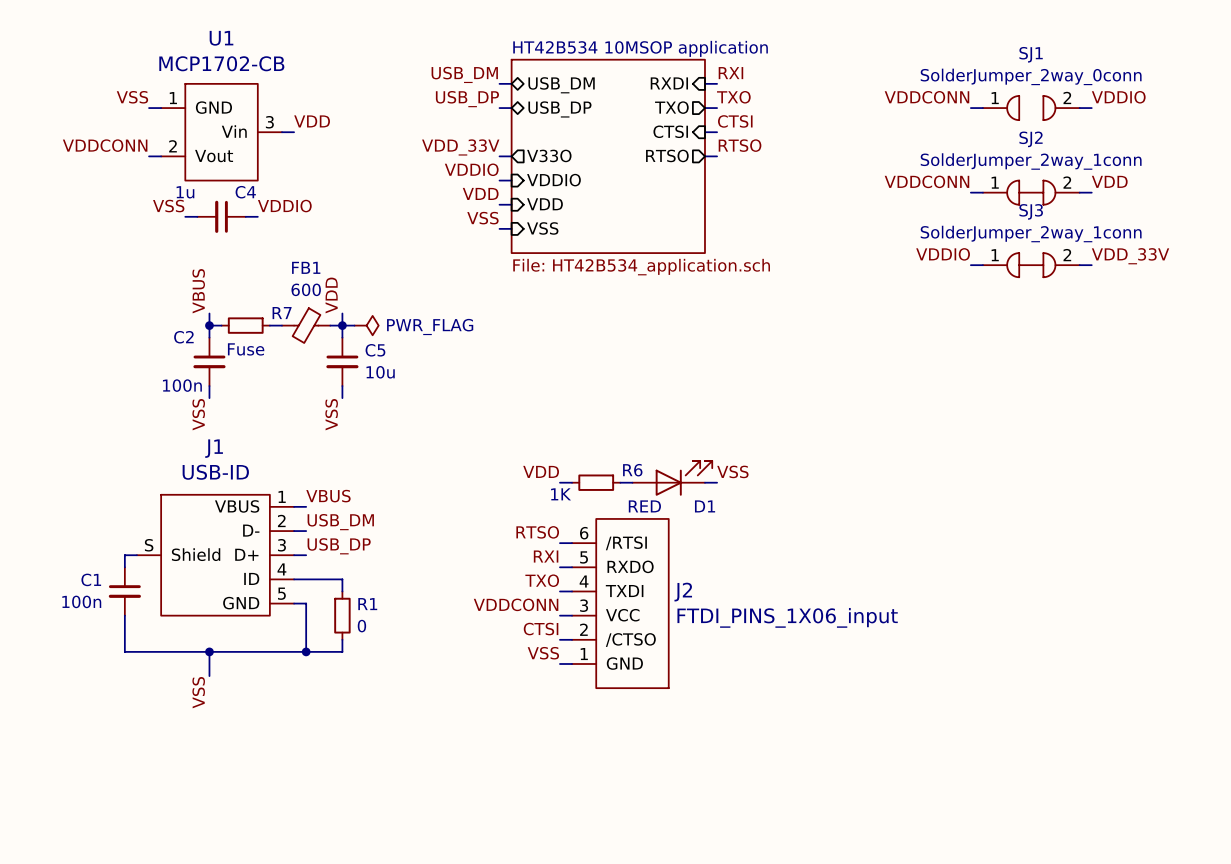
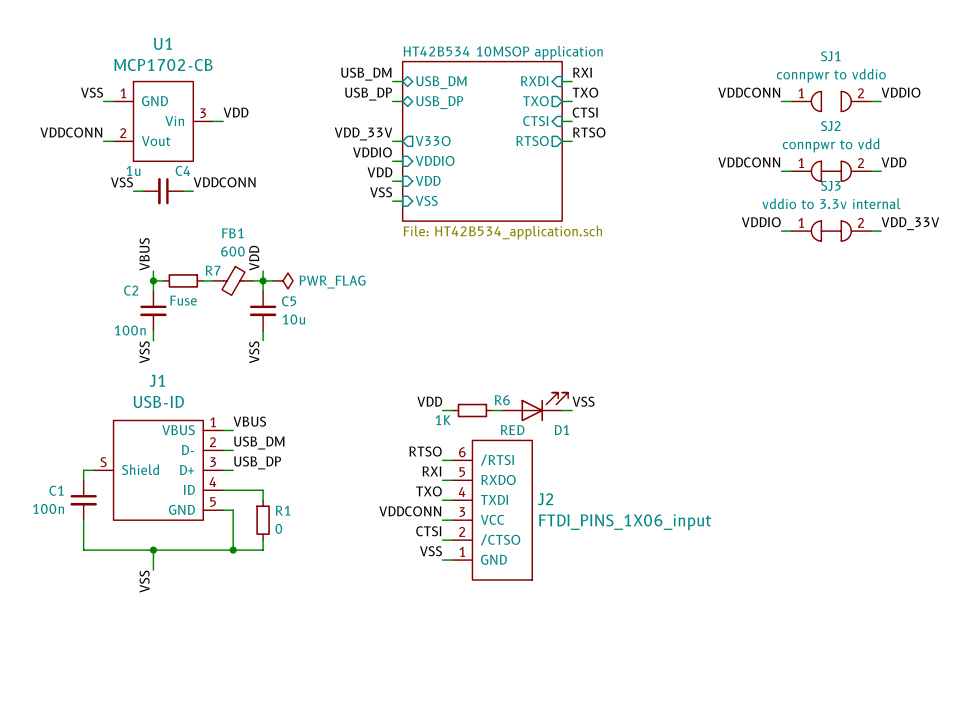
SJ1 value: SolderJumper_2way_0conn (1031, 76) -> connpwr to vddio (831, 75)
SJ2 value: SolderJumper_2way_1conn (1031, 161) -> connpwr to vdd (831, 145)
label: VDDIO (284, 206) -> VDDCONN (224, 182)
SJ3 value: SolderJumper_2way_1conn (1031, 234) -> vddio to 3.3v internal (831, 203)

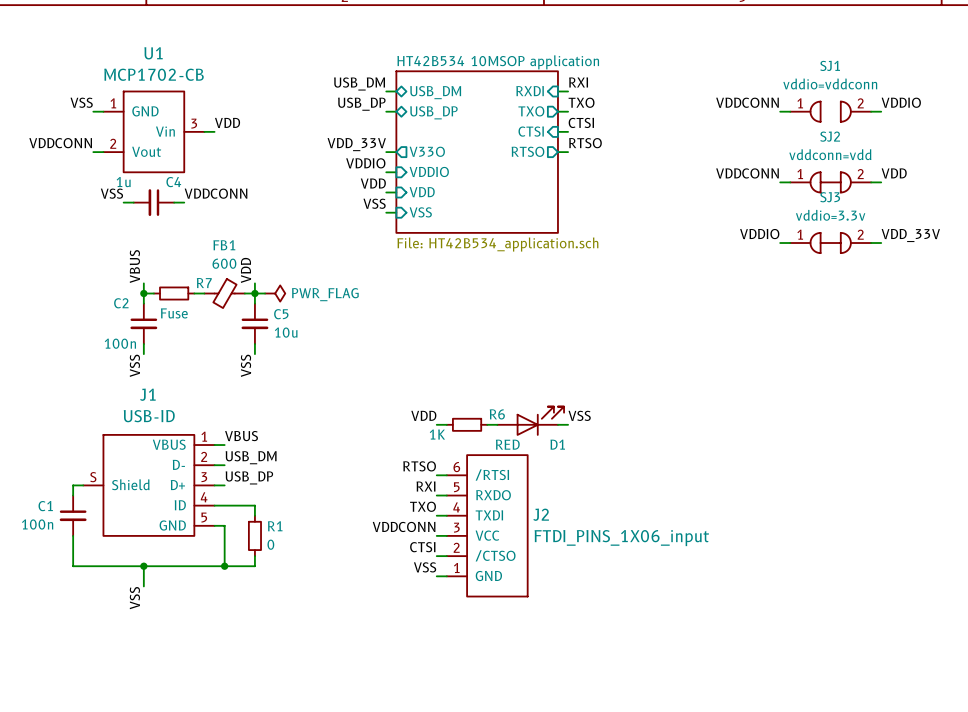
SJ1 value: connpwr to vddio (831, 75) -> vddio=vddconn (830, 83)
SJ2 value: connpwr to vdd (831, 145) -> vddconn=vdd (830, 154)
SJ3 value: vddio to 3.3v internal (831, 203) -> vddio=3.3v (830, 215)

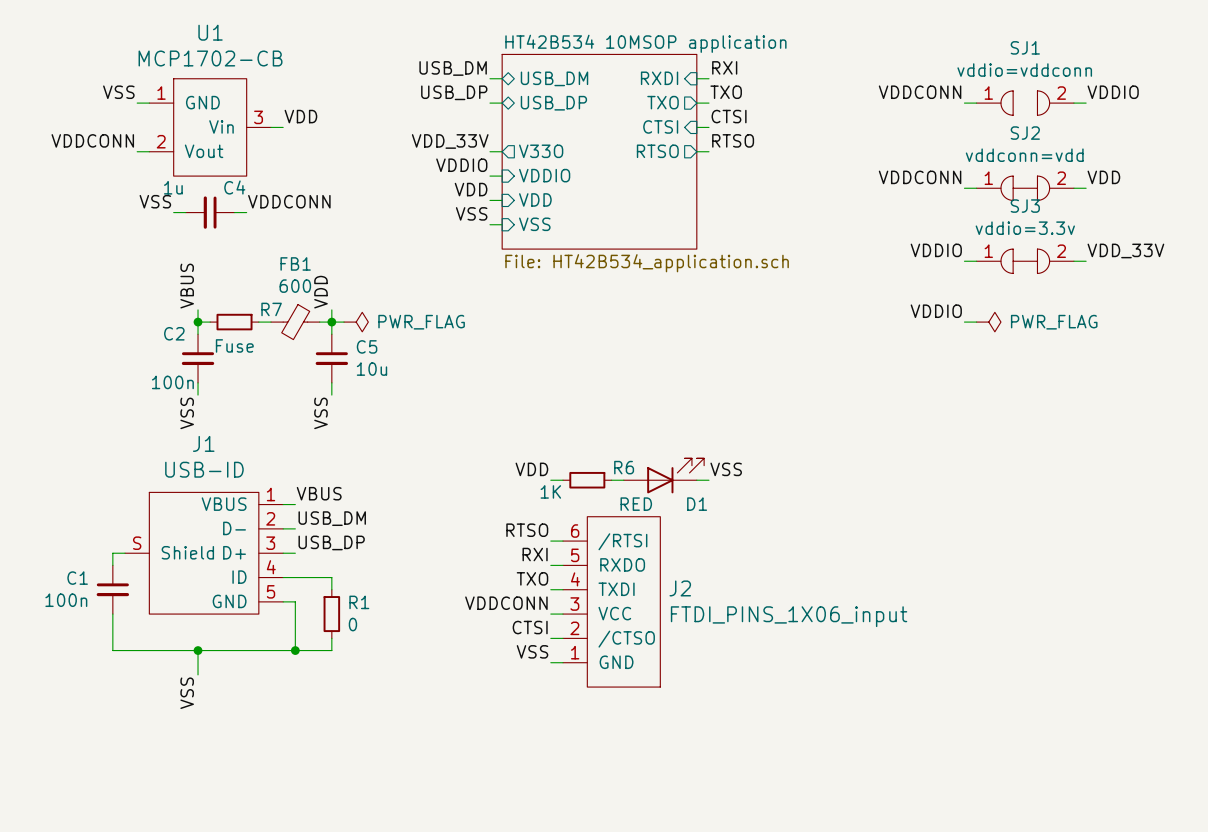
label: none -> VDDIO (936, 311)
wire: none -> (964, 322) (976, 322)
power symbol: none -> PWR_FLAG (988, 322)

